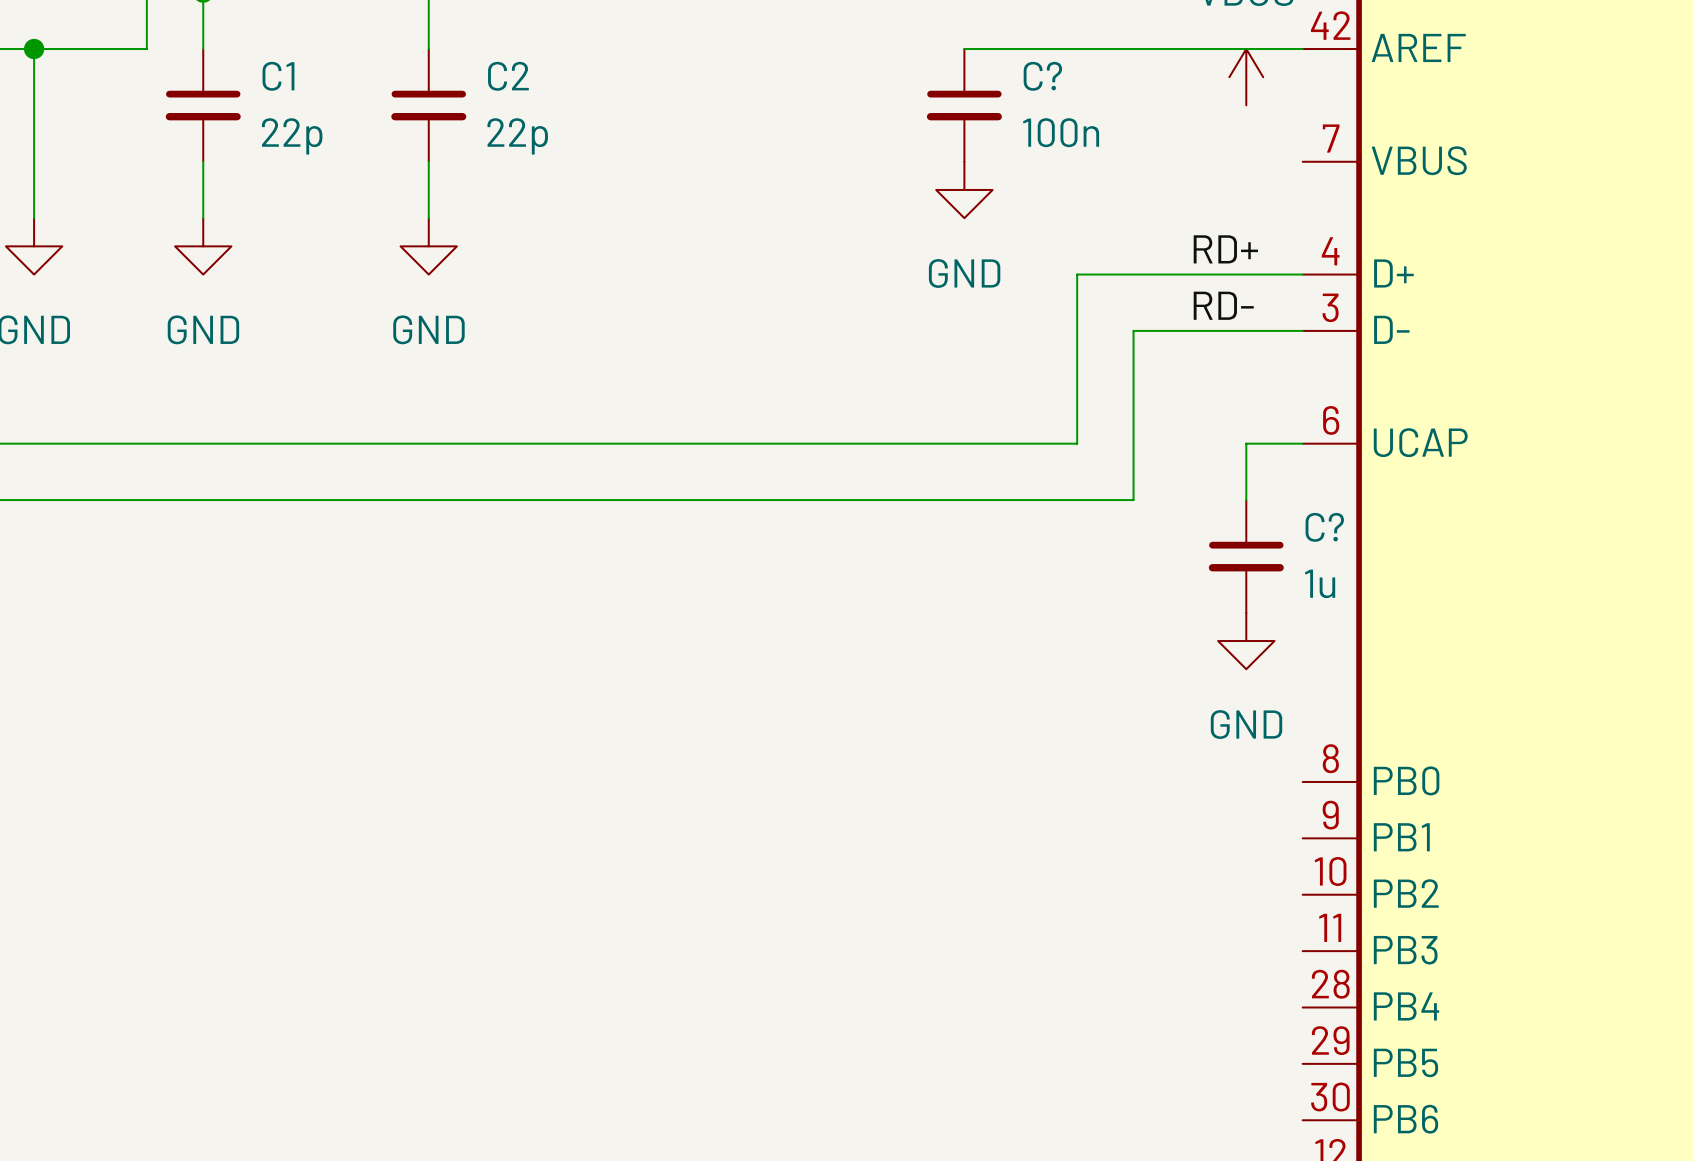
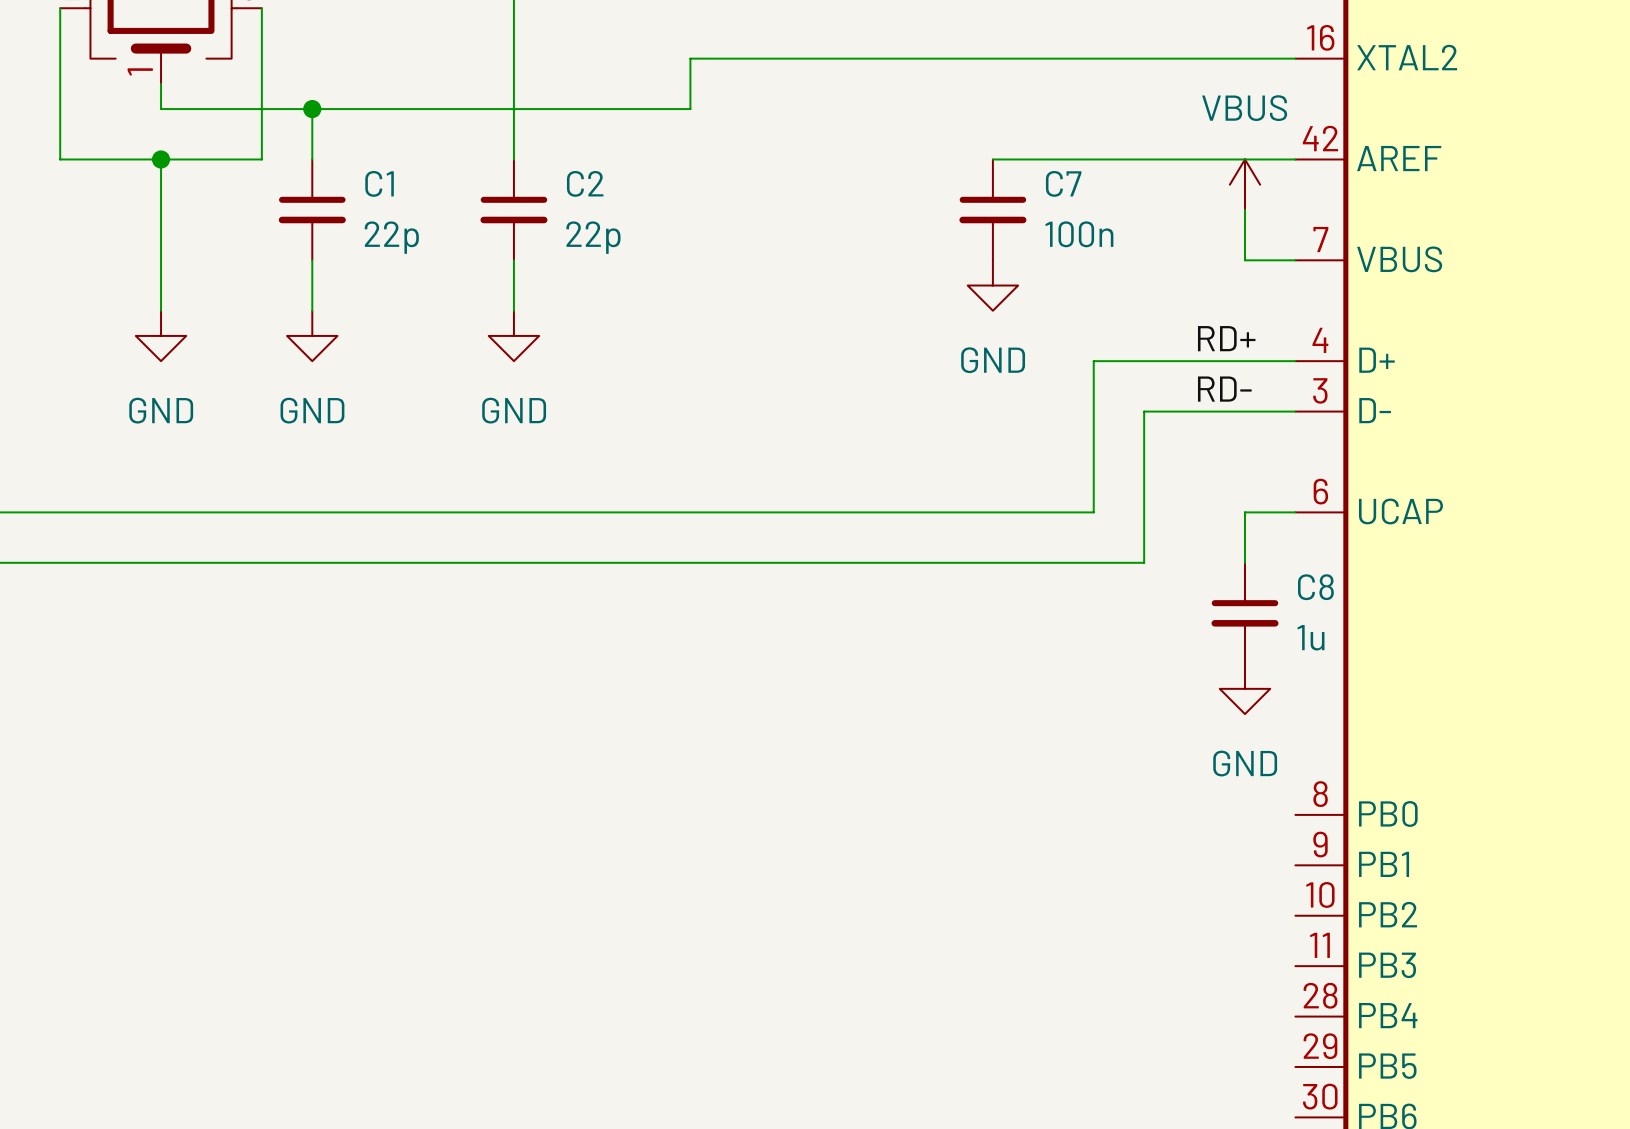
C? name: C? (1042, 76) -> C7 (1063, 183)
wire: none -> (1245, 209) (1245, 260) (1295, 260)
C? name: C? (1324, 527) -> C8 (1315, 587)

